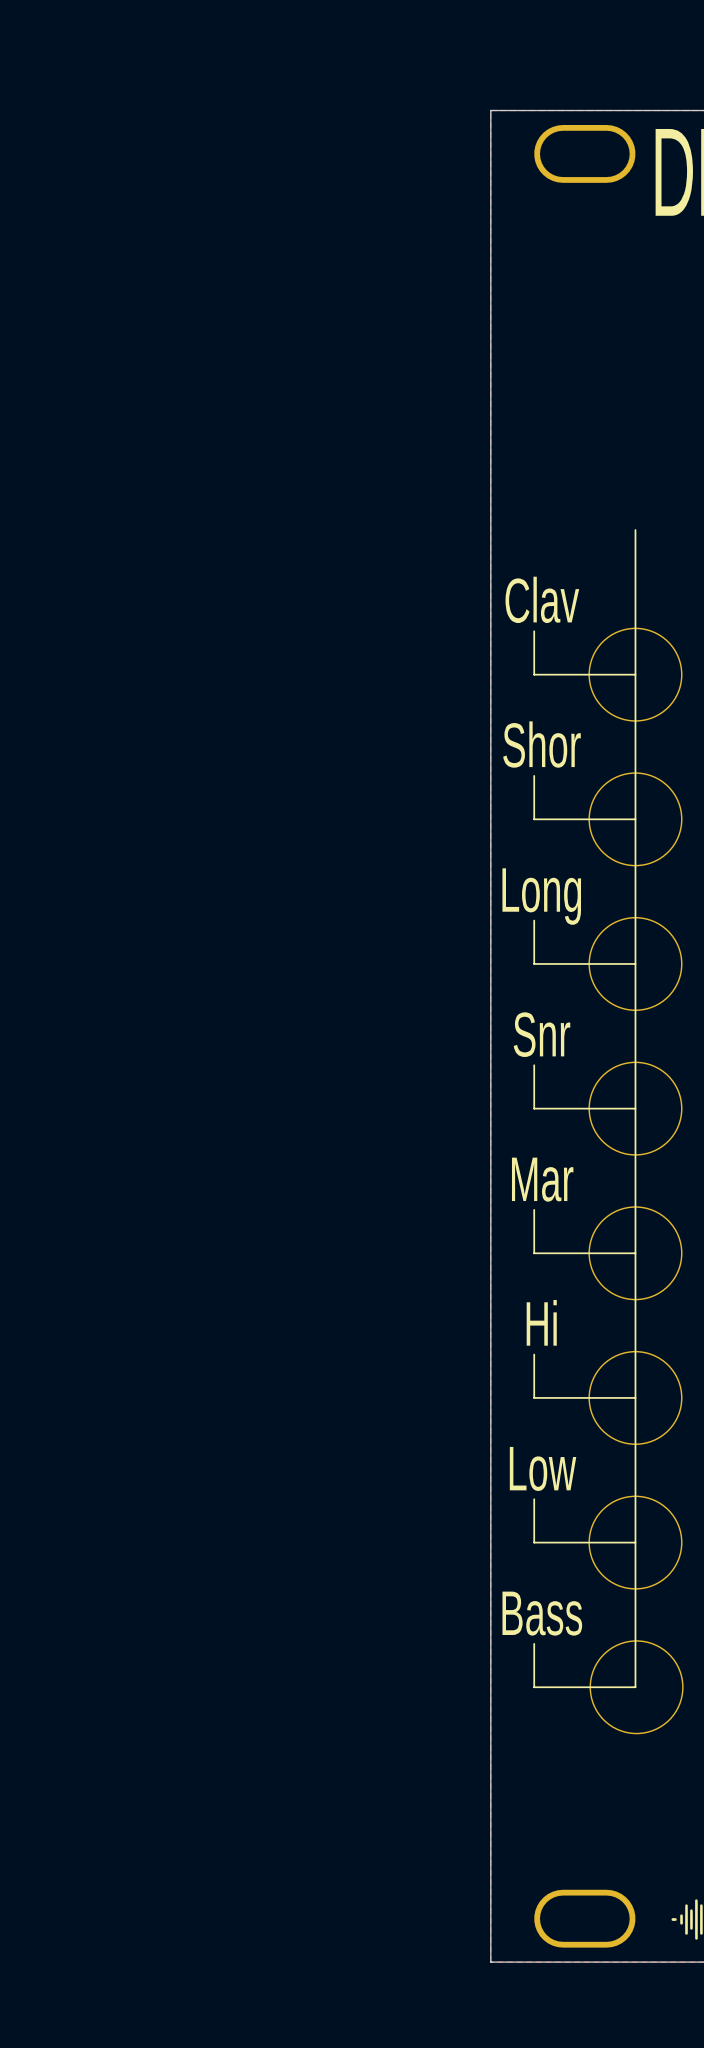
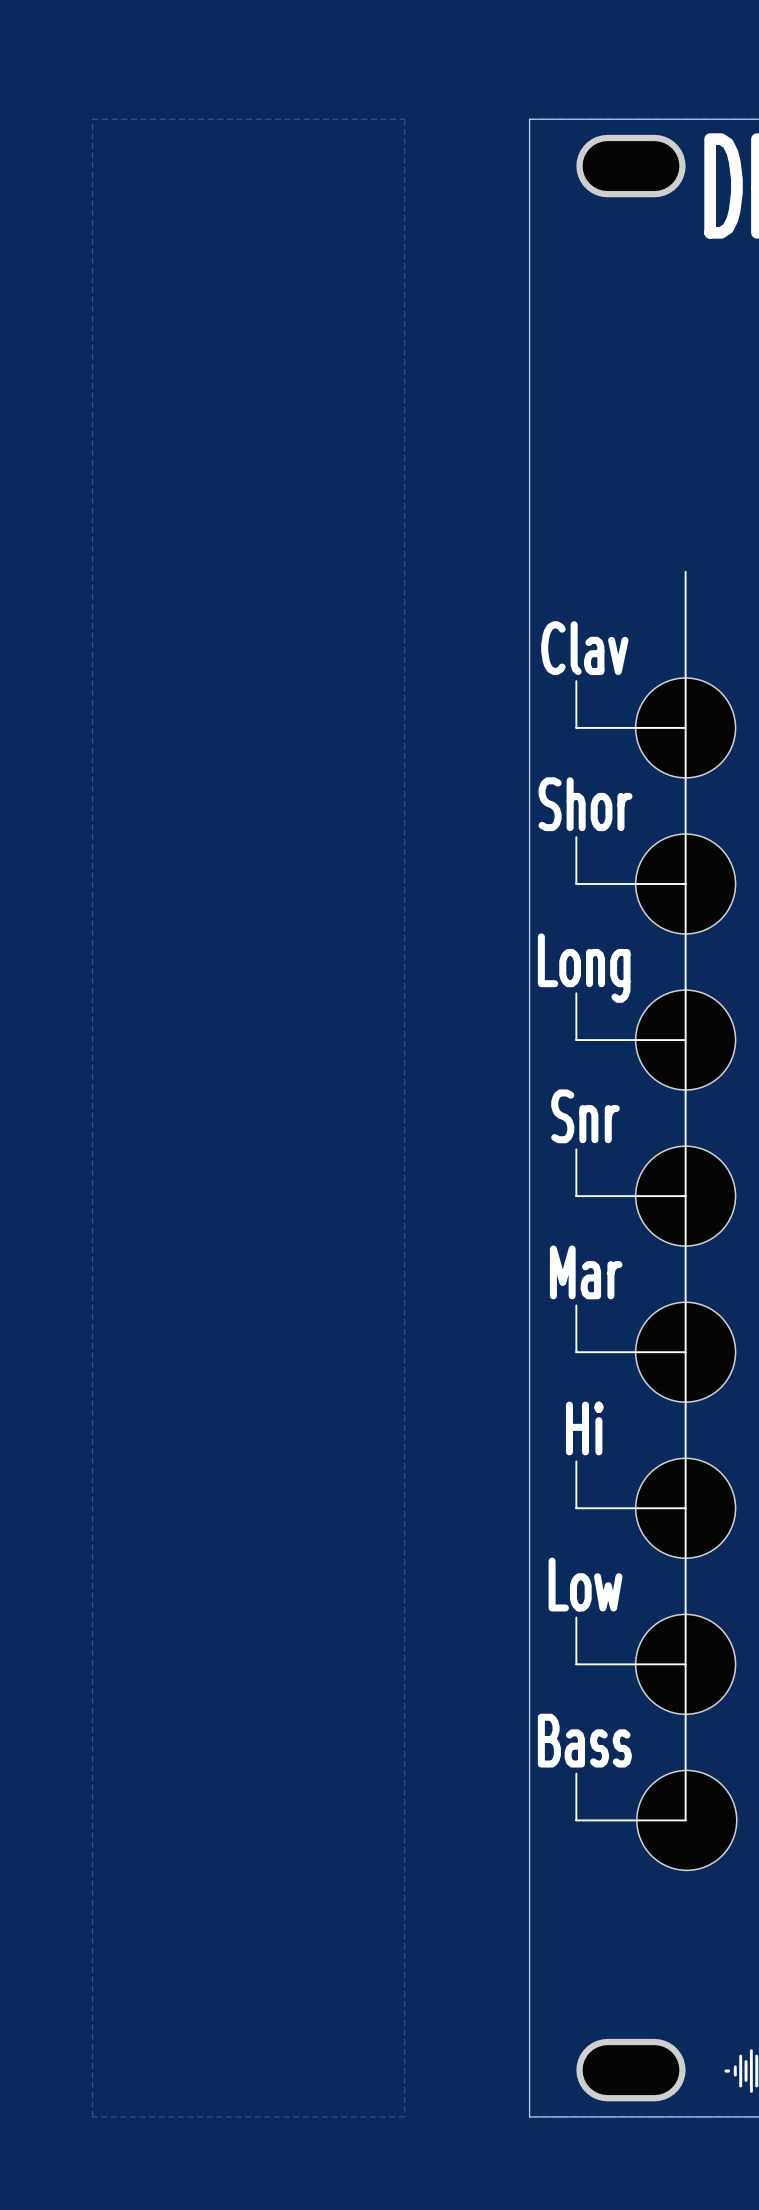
zone outline: none -> (92, 119) (404, 119) (404, 2116) (92, 2116) (92, 119)

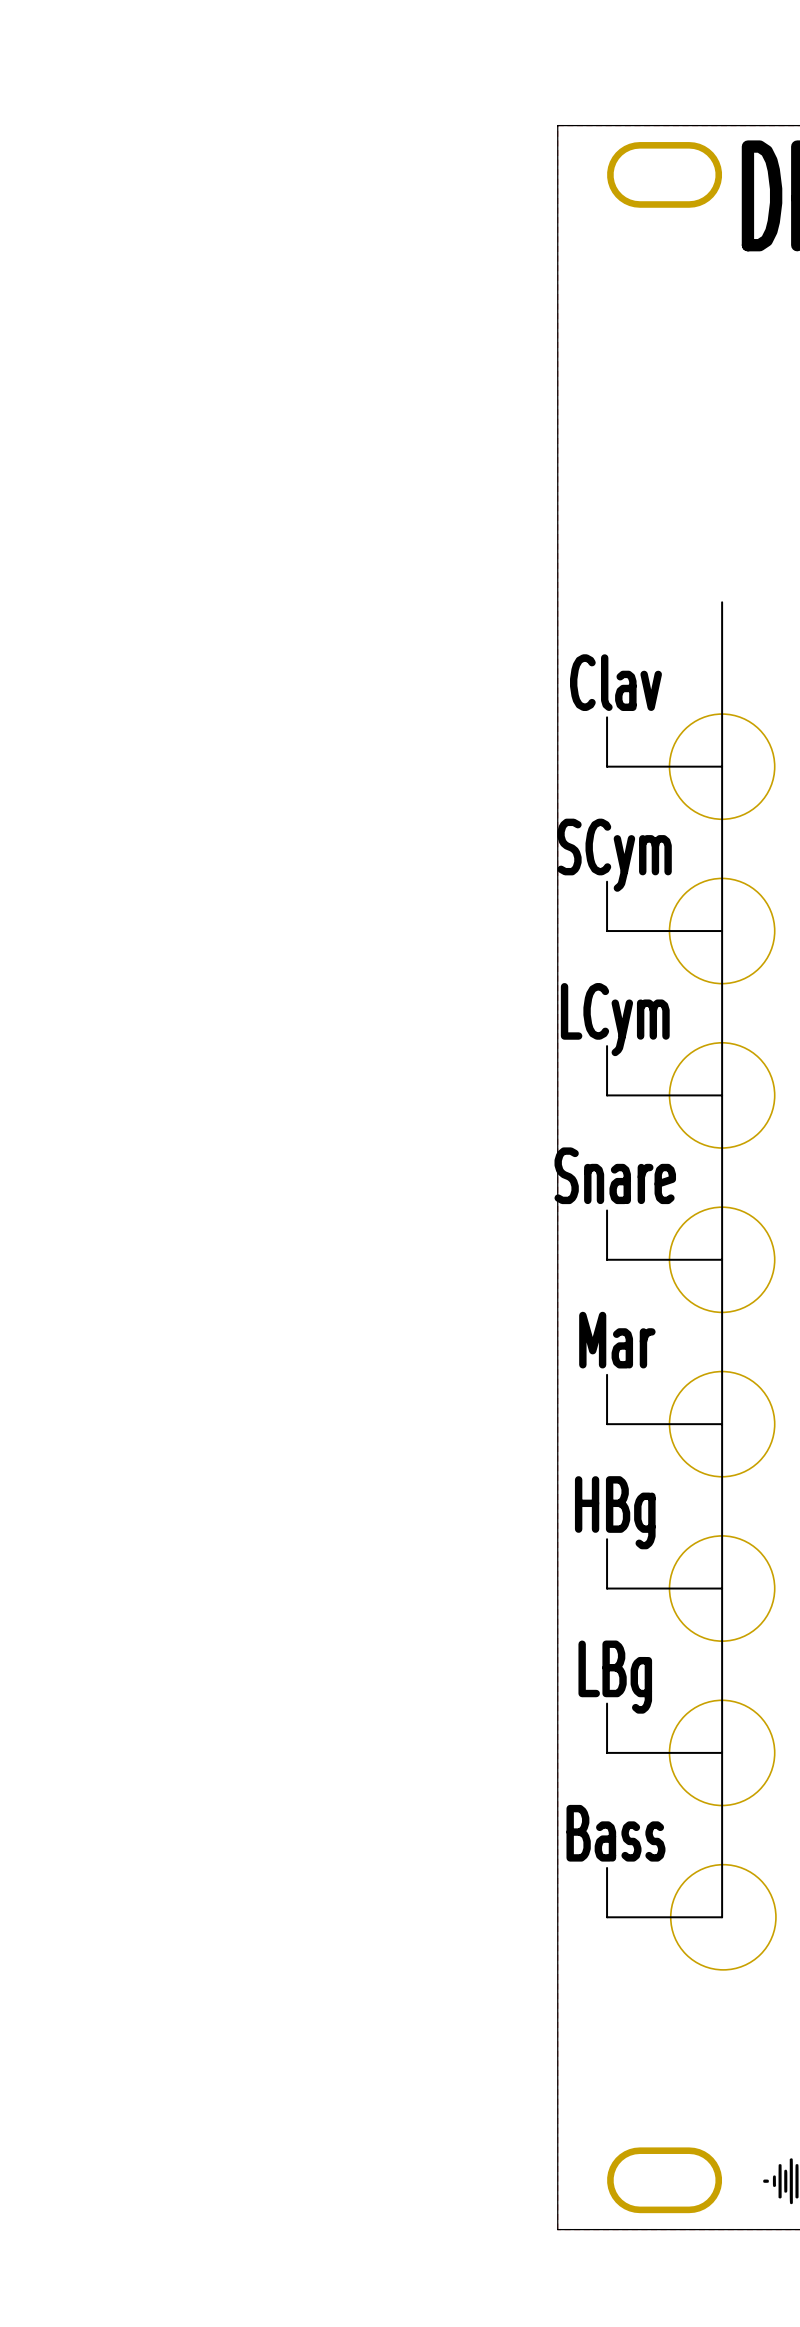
zone outline: (92, 119) (404, 119) (404, 2116) (92, 2116) (92, 119) -> none
text: Shor (585, 804) -> SCym (614, 855)
text: Long (584, 968) -> LCym (615, 1019)
text: Snr (585, 1116) -> Snare (615, 1175)
text: Hi (584, 1428) -> HBg (615, 1512)
text: Low (585, 1584) -> LBg (615, 1677)

